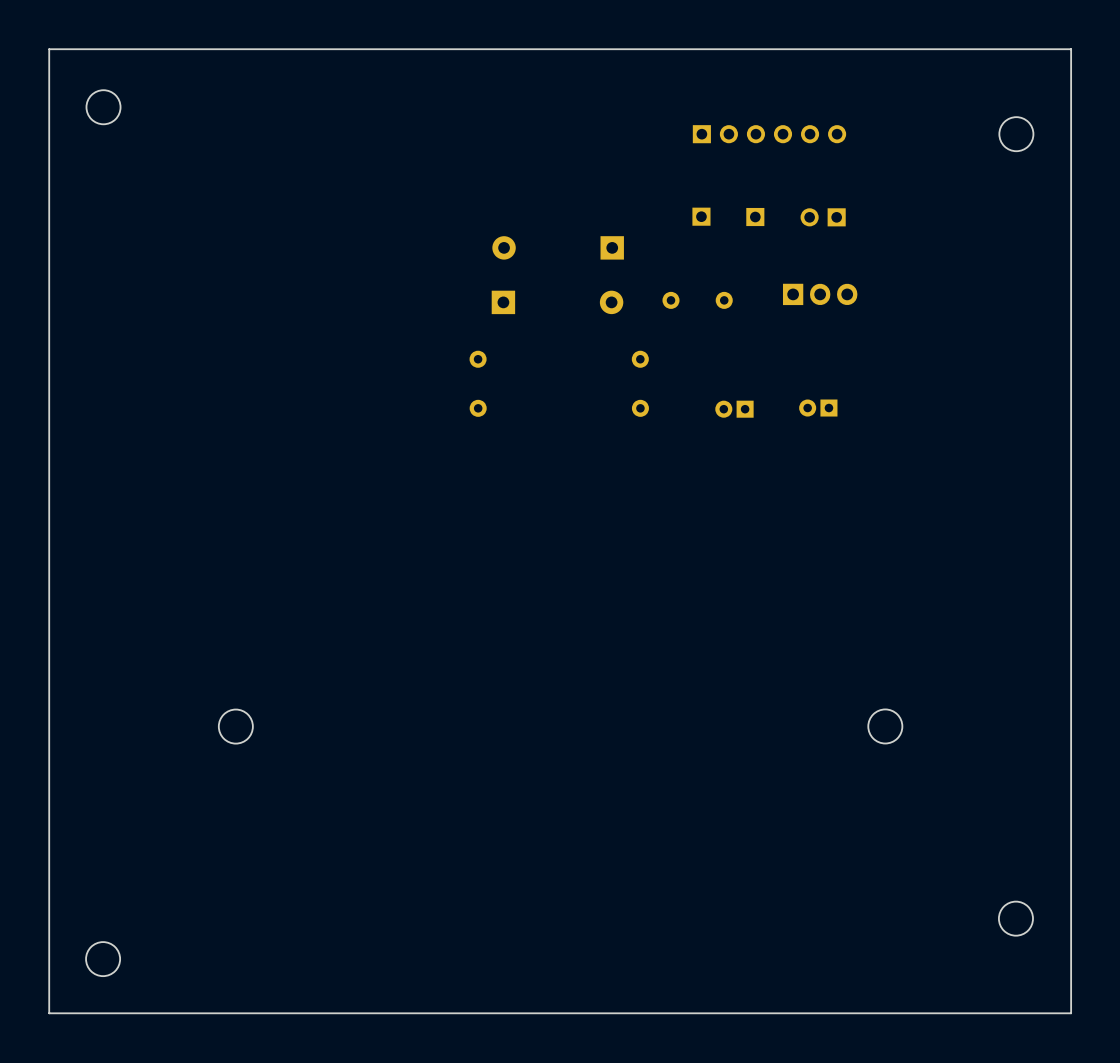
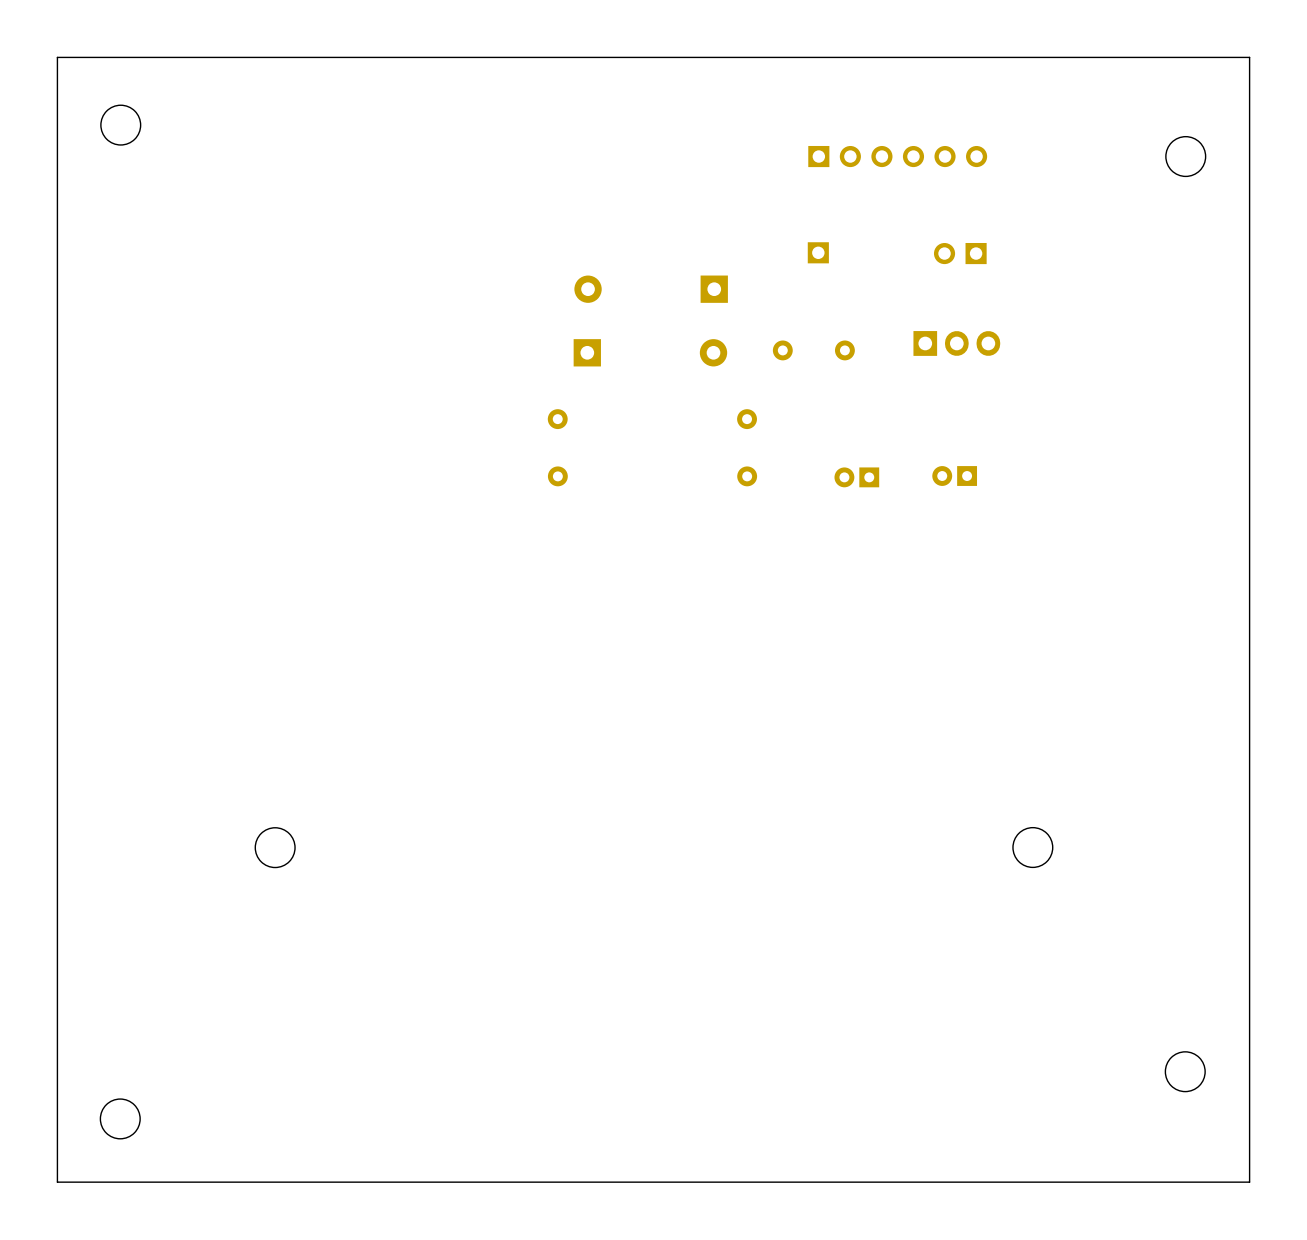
part: (755, 217) -> none

